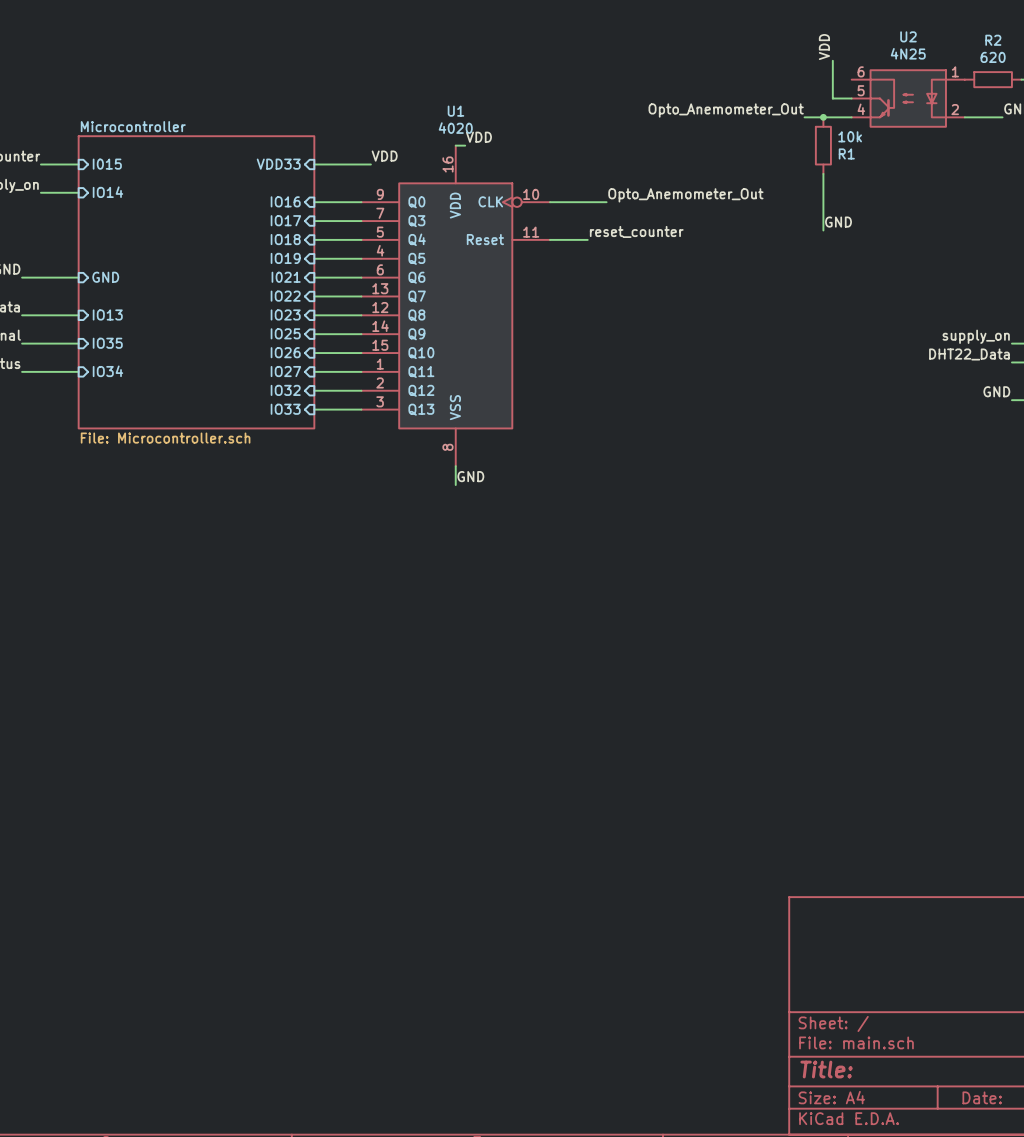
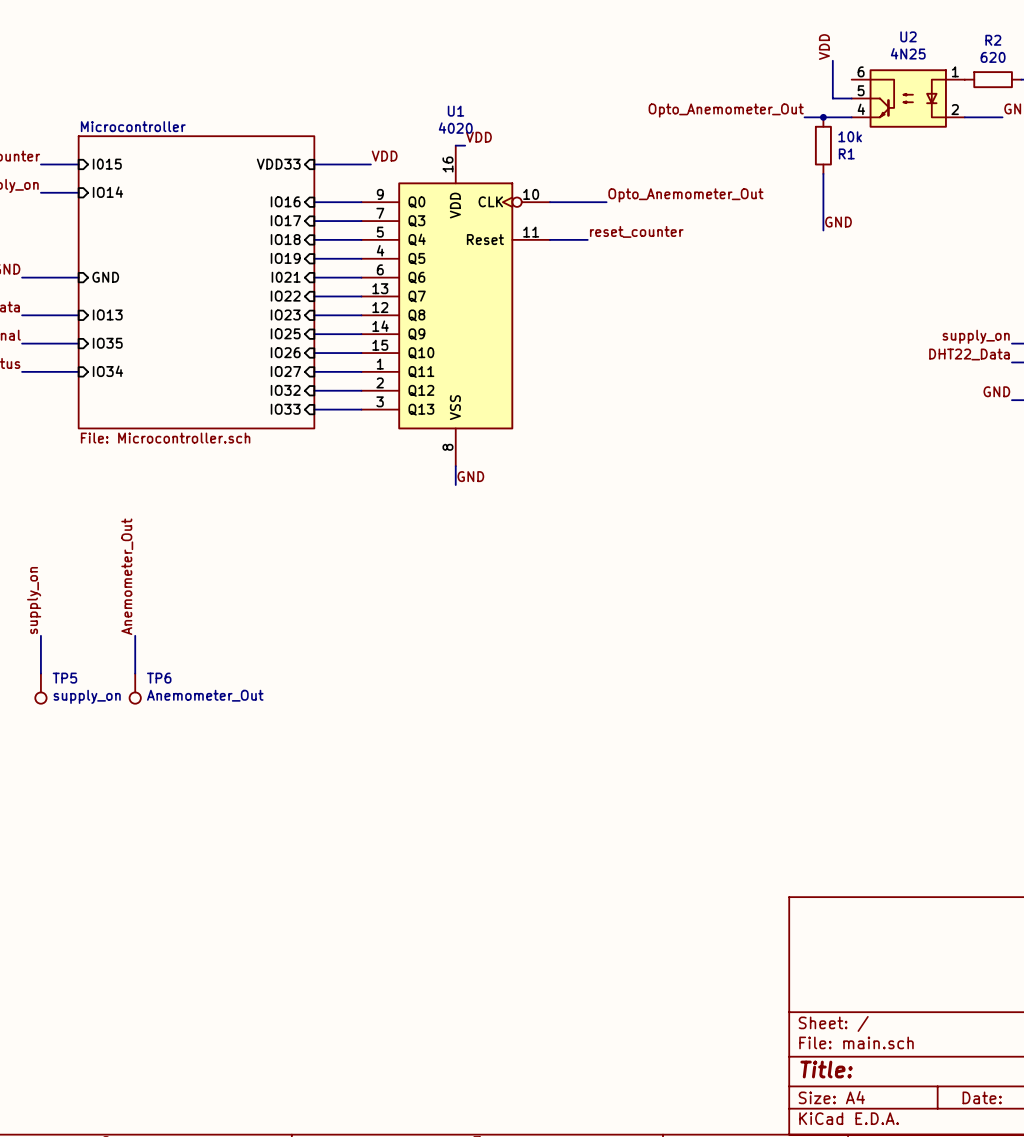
label: none -> Anemometer_Out (127, 576)
label: none -> supply_on (34, 600)
wire: none -> (40, 635) (40, 673)
wire: none -> (135, 635) (135, 673)
TP5: none -> supply_on (40, 688)
TP6: none -> Anemometer_Out (135, 688)

